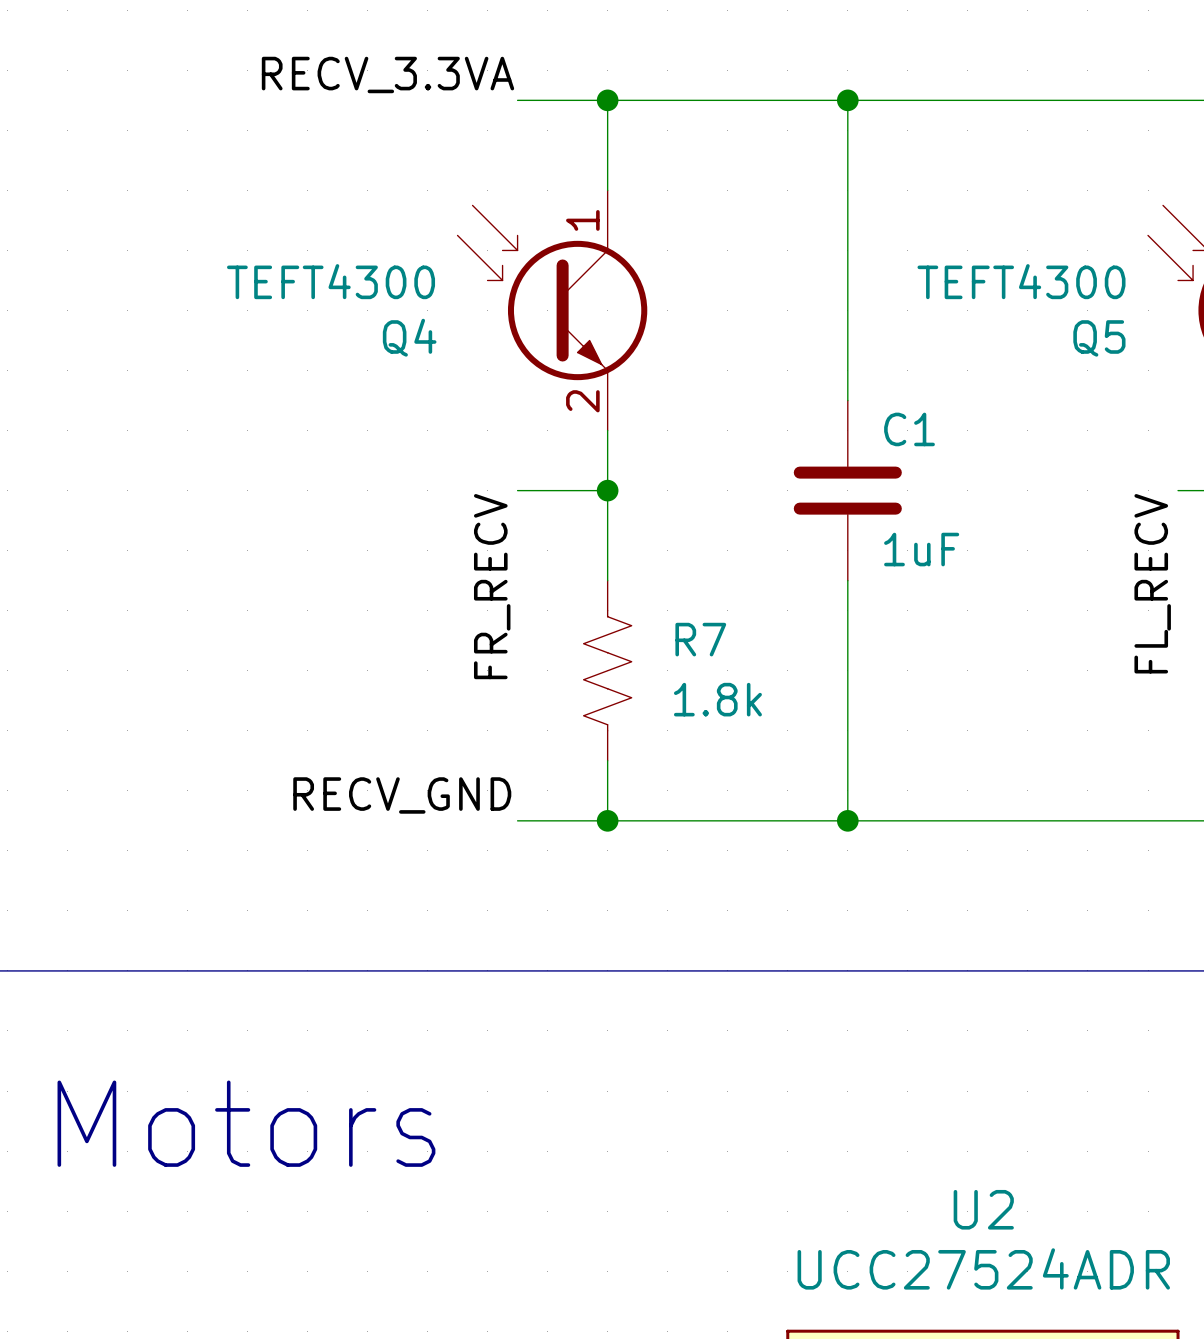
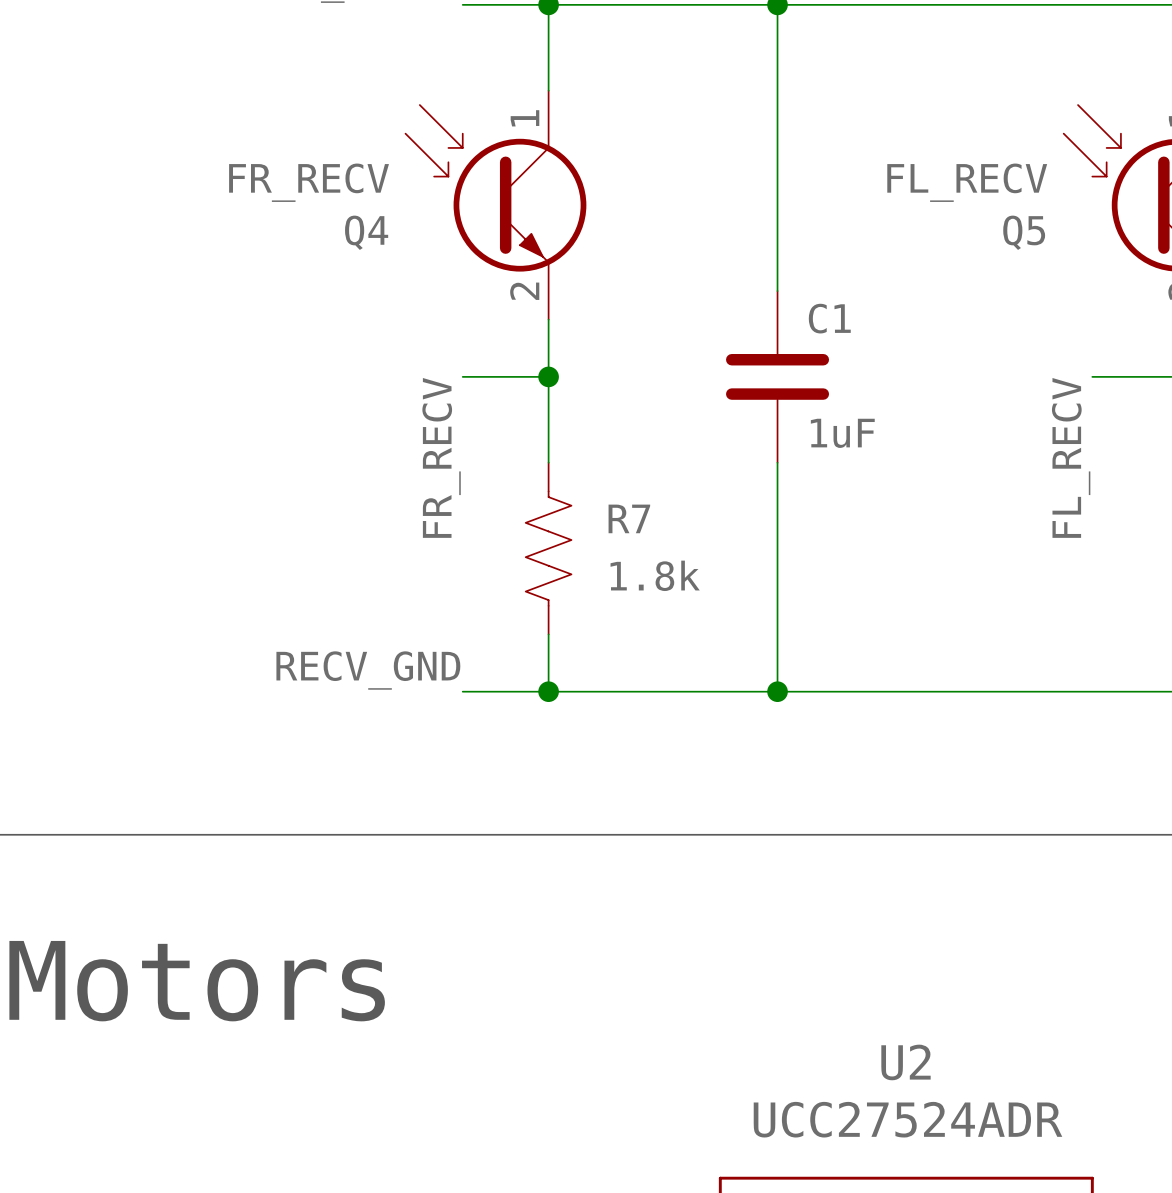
Q4 value: TEFT4300 (331, 281) -> FR_RECV (309, 182)
Q5 value: TEFT4300 (1021, 281) -> FL_RECV (967, 182)

